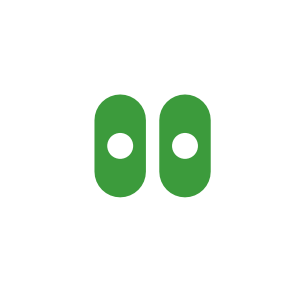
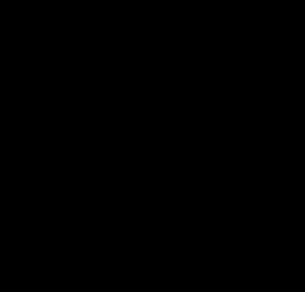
part: (152, 145) -> none

